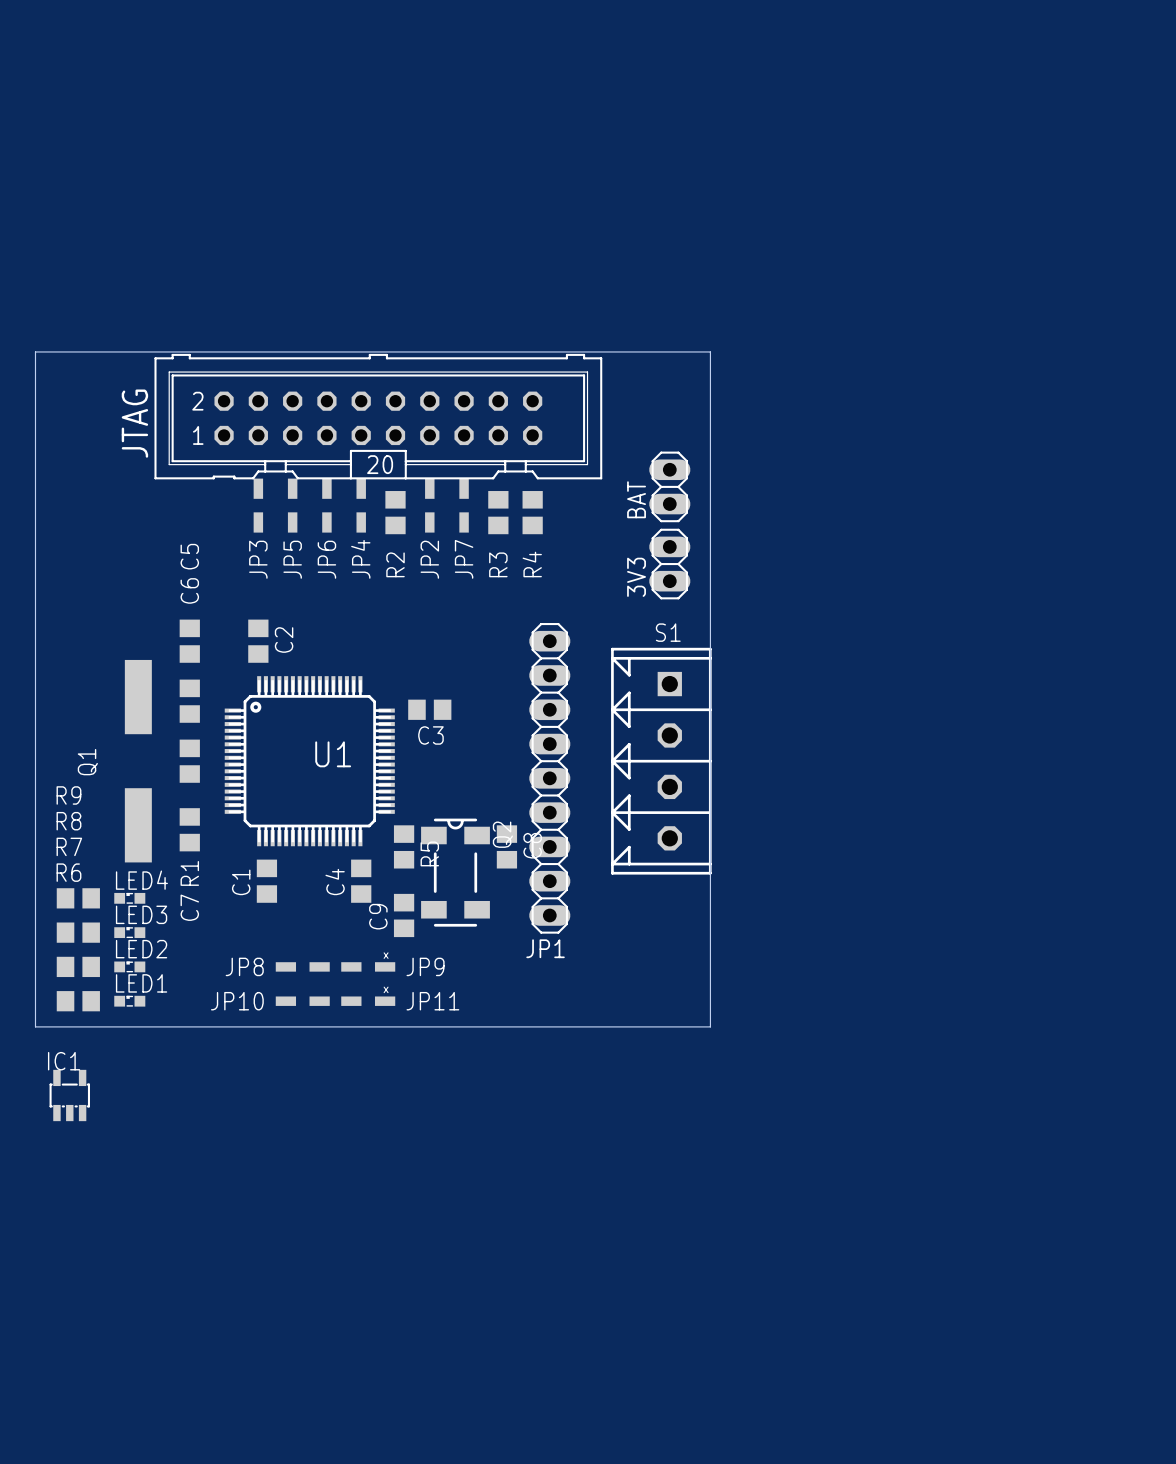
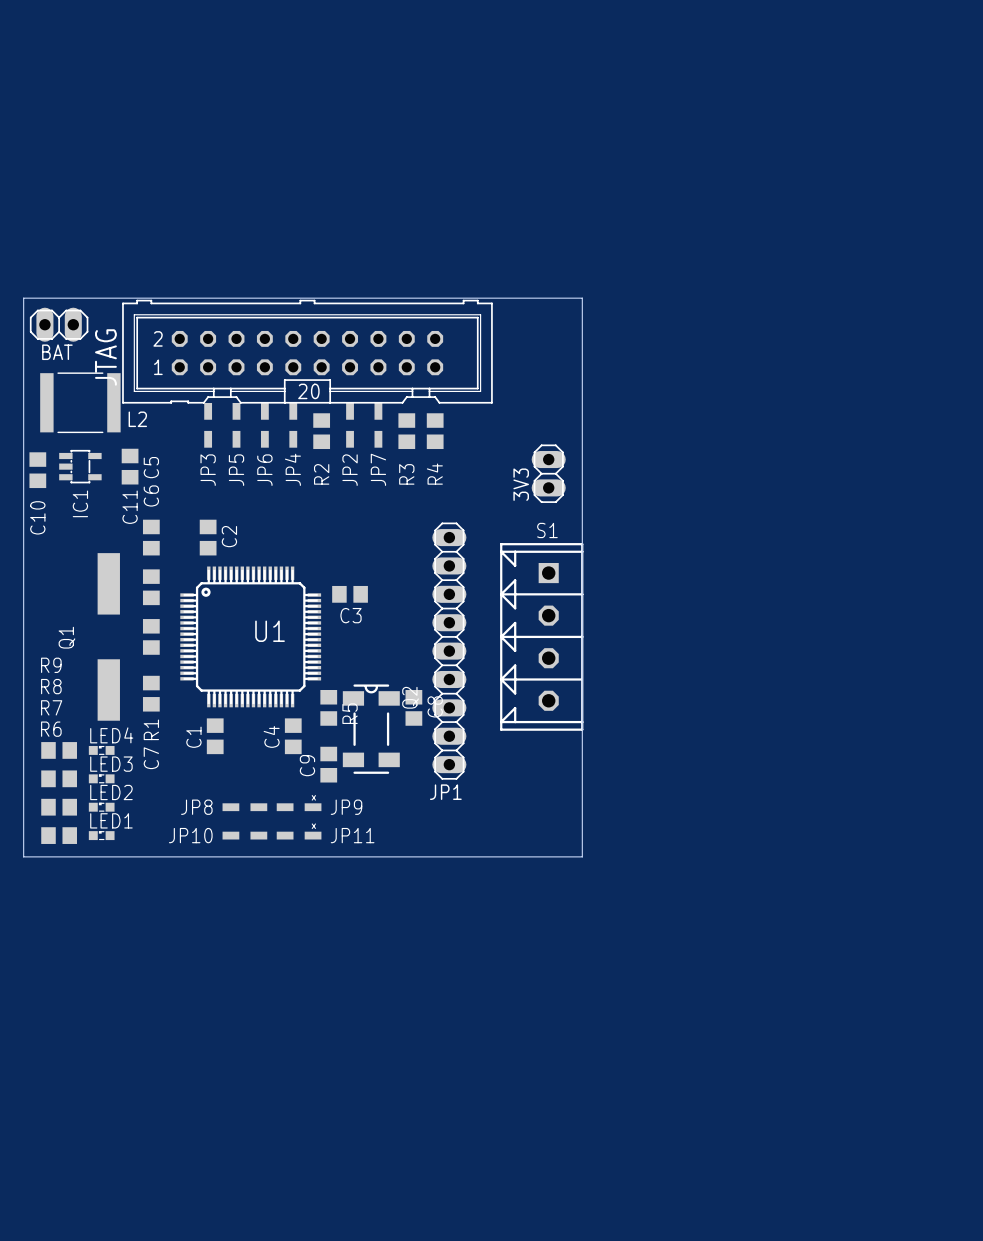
BAT: none -> (59, 324)
L2: none -> (80, 402)
BAT: (669, 486) -> none
C11: none -> (130, 466)
C10: none -> (37, 470)
IC1 name position: IC1 (64, 1061) -> IC1 (80, 503)
IC1 rotation: 0° (69, 1095) -> 90° clockwise (80, 466)
IC1 position: (69, 1095) -> (80, 466)

